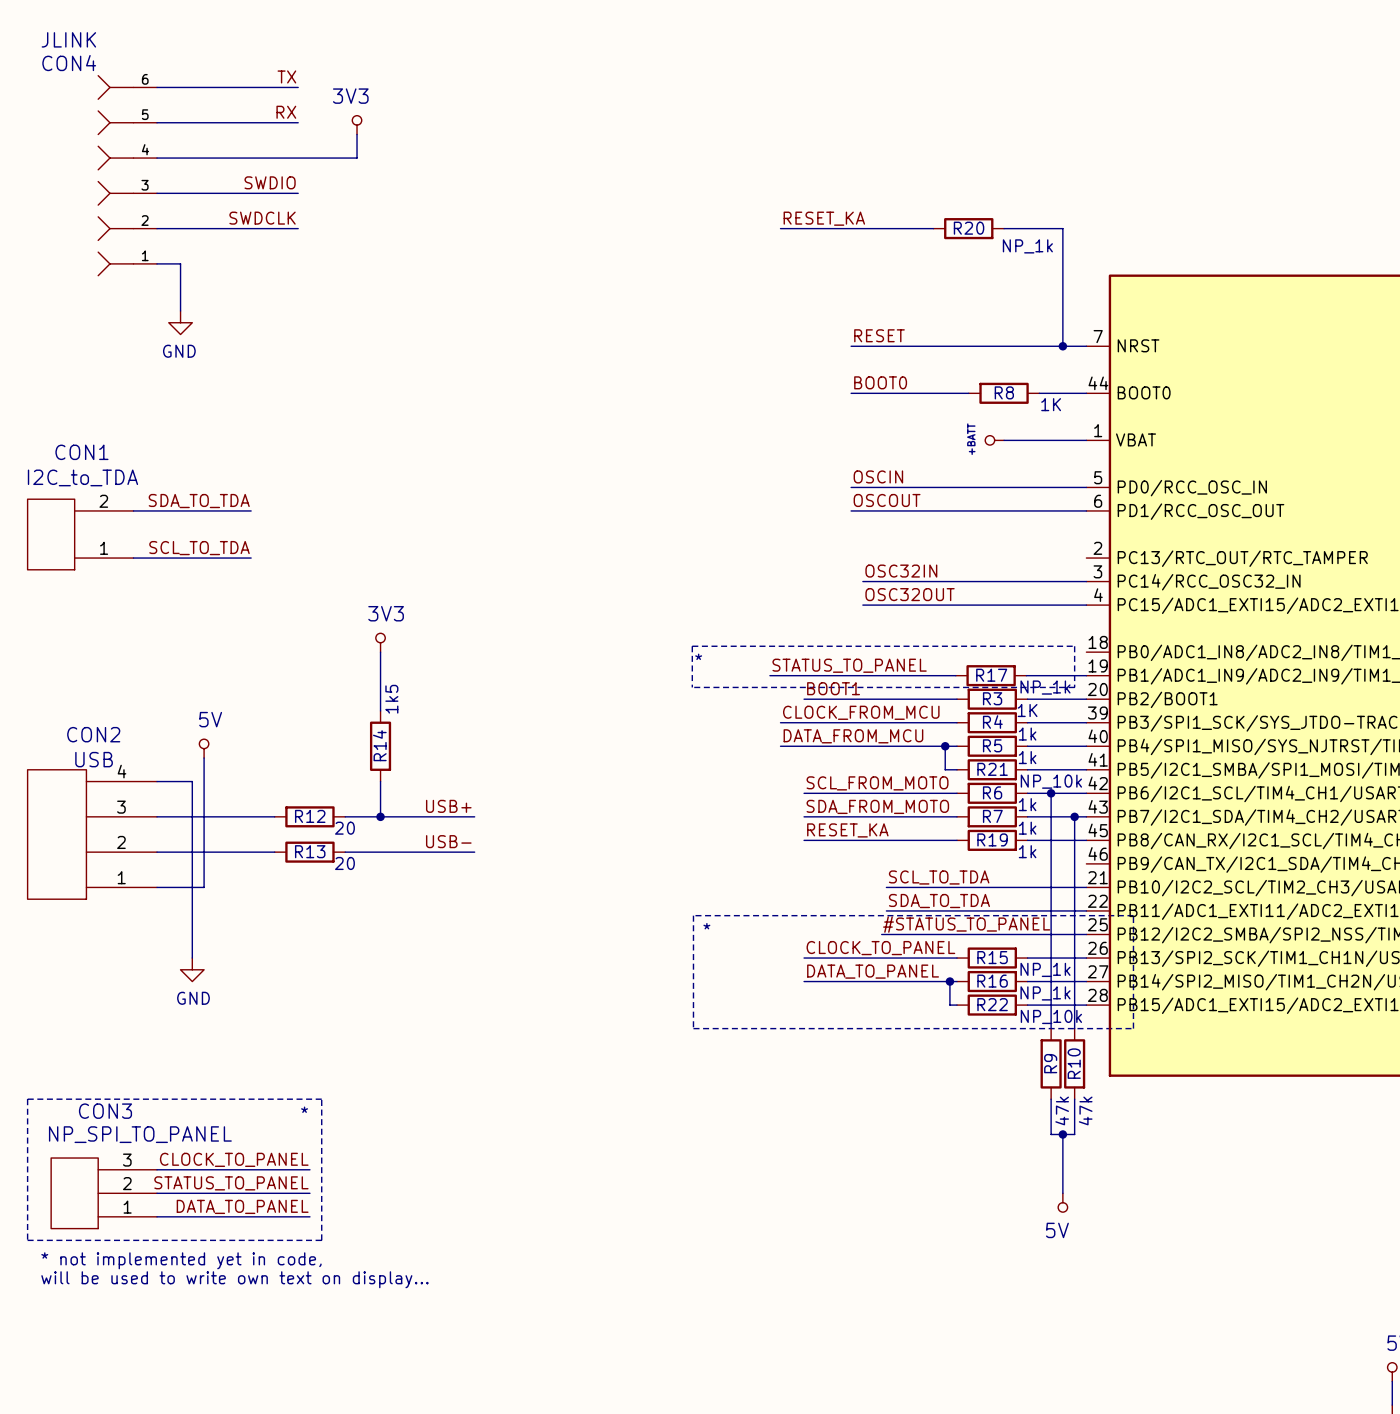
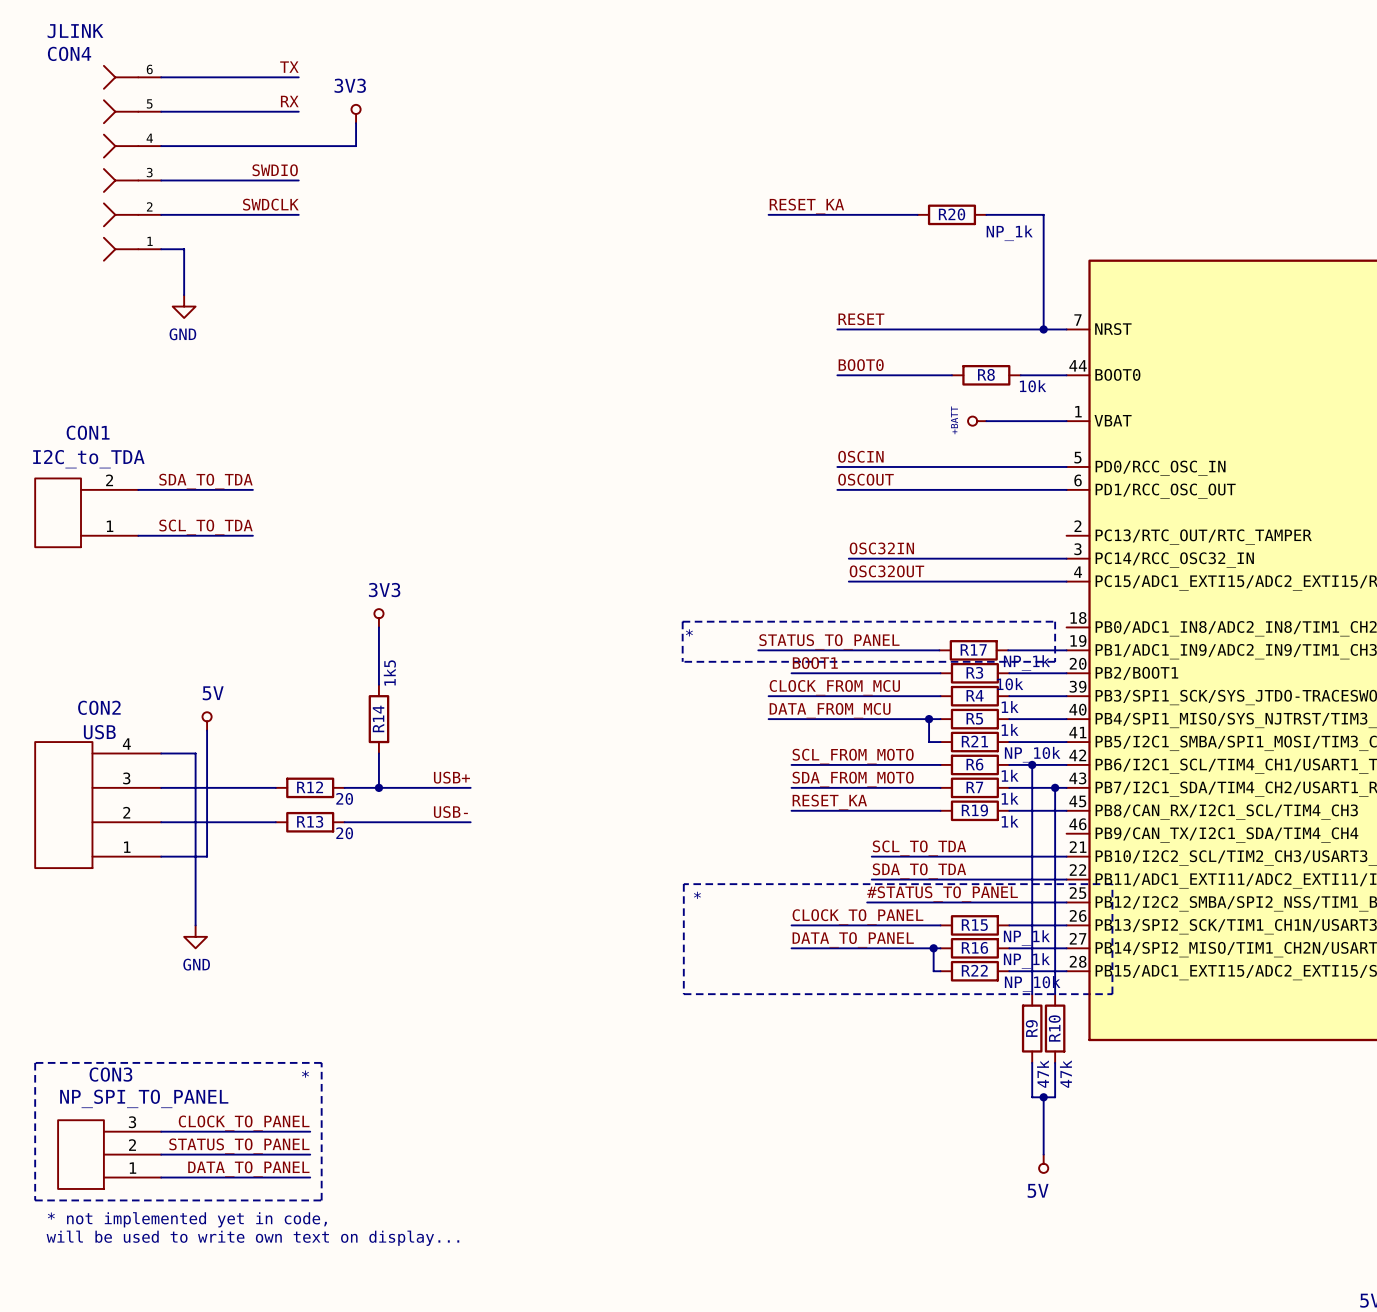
R8 value: 1K (1051, 404) -> 10k (1033, 386)
R3 value: 1K (1027, 710) -> 10k (1010, 684)

